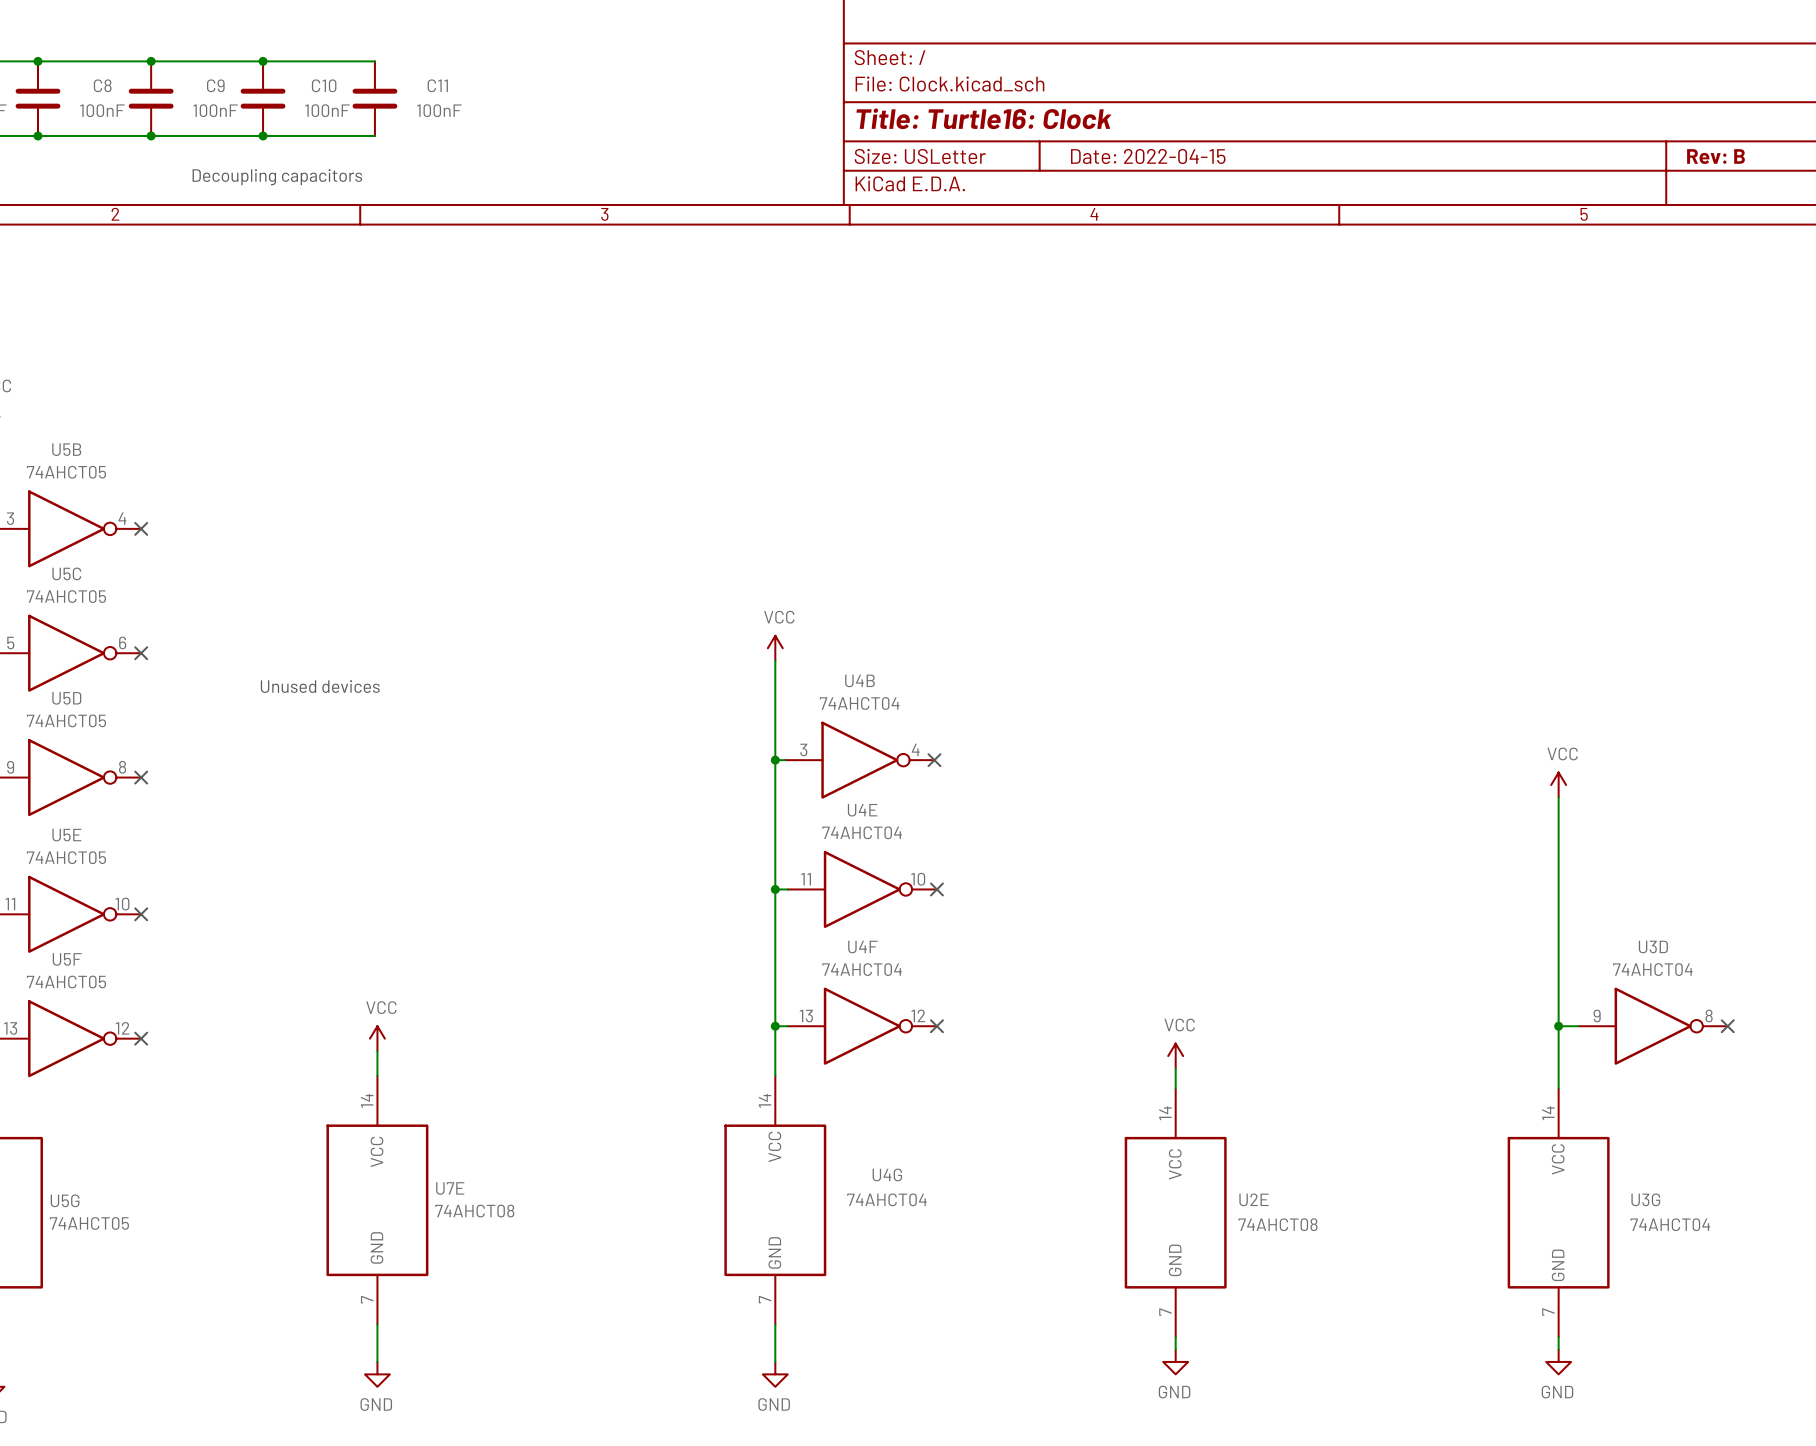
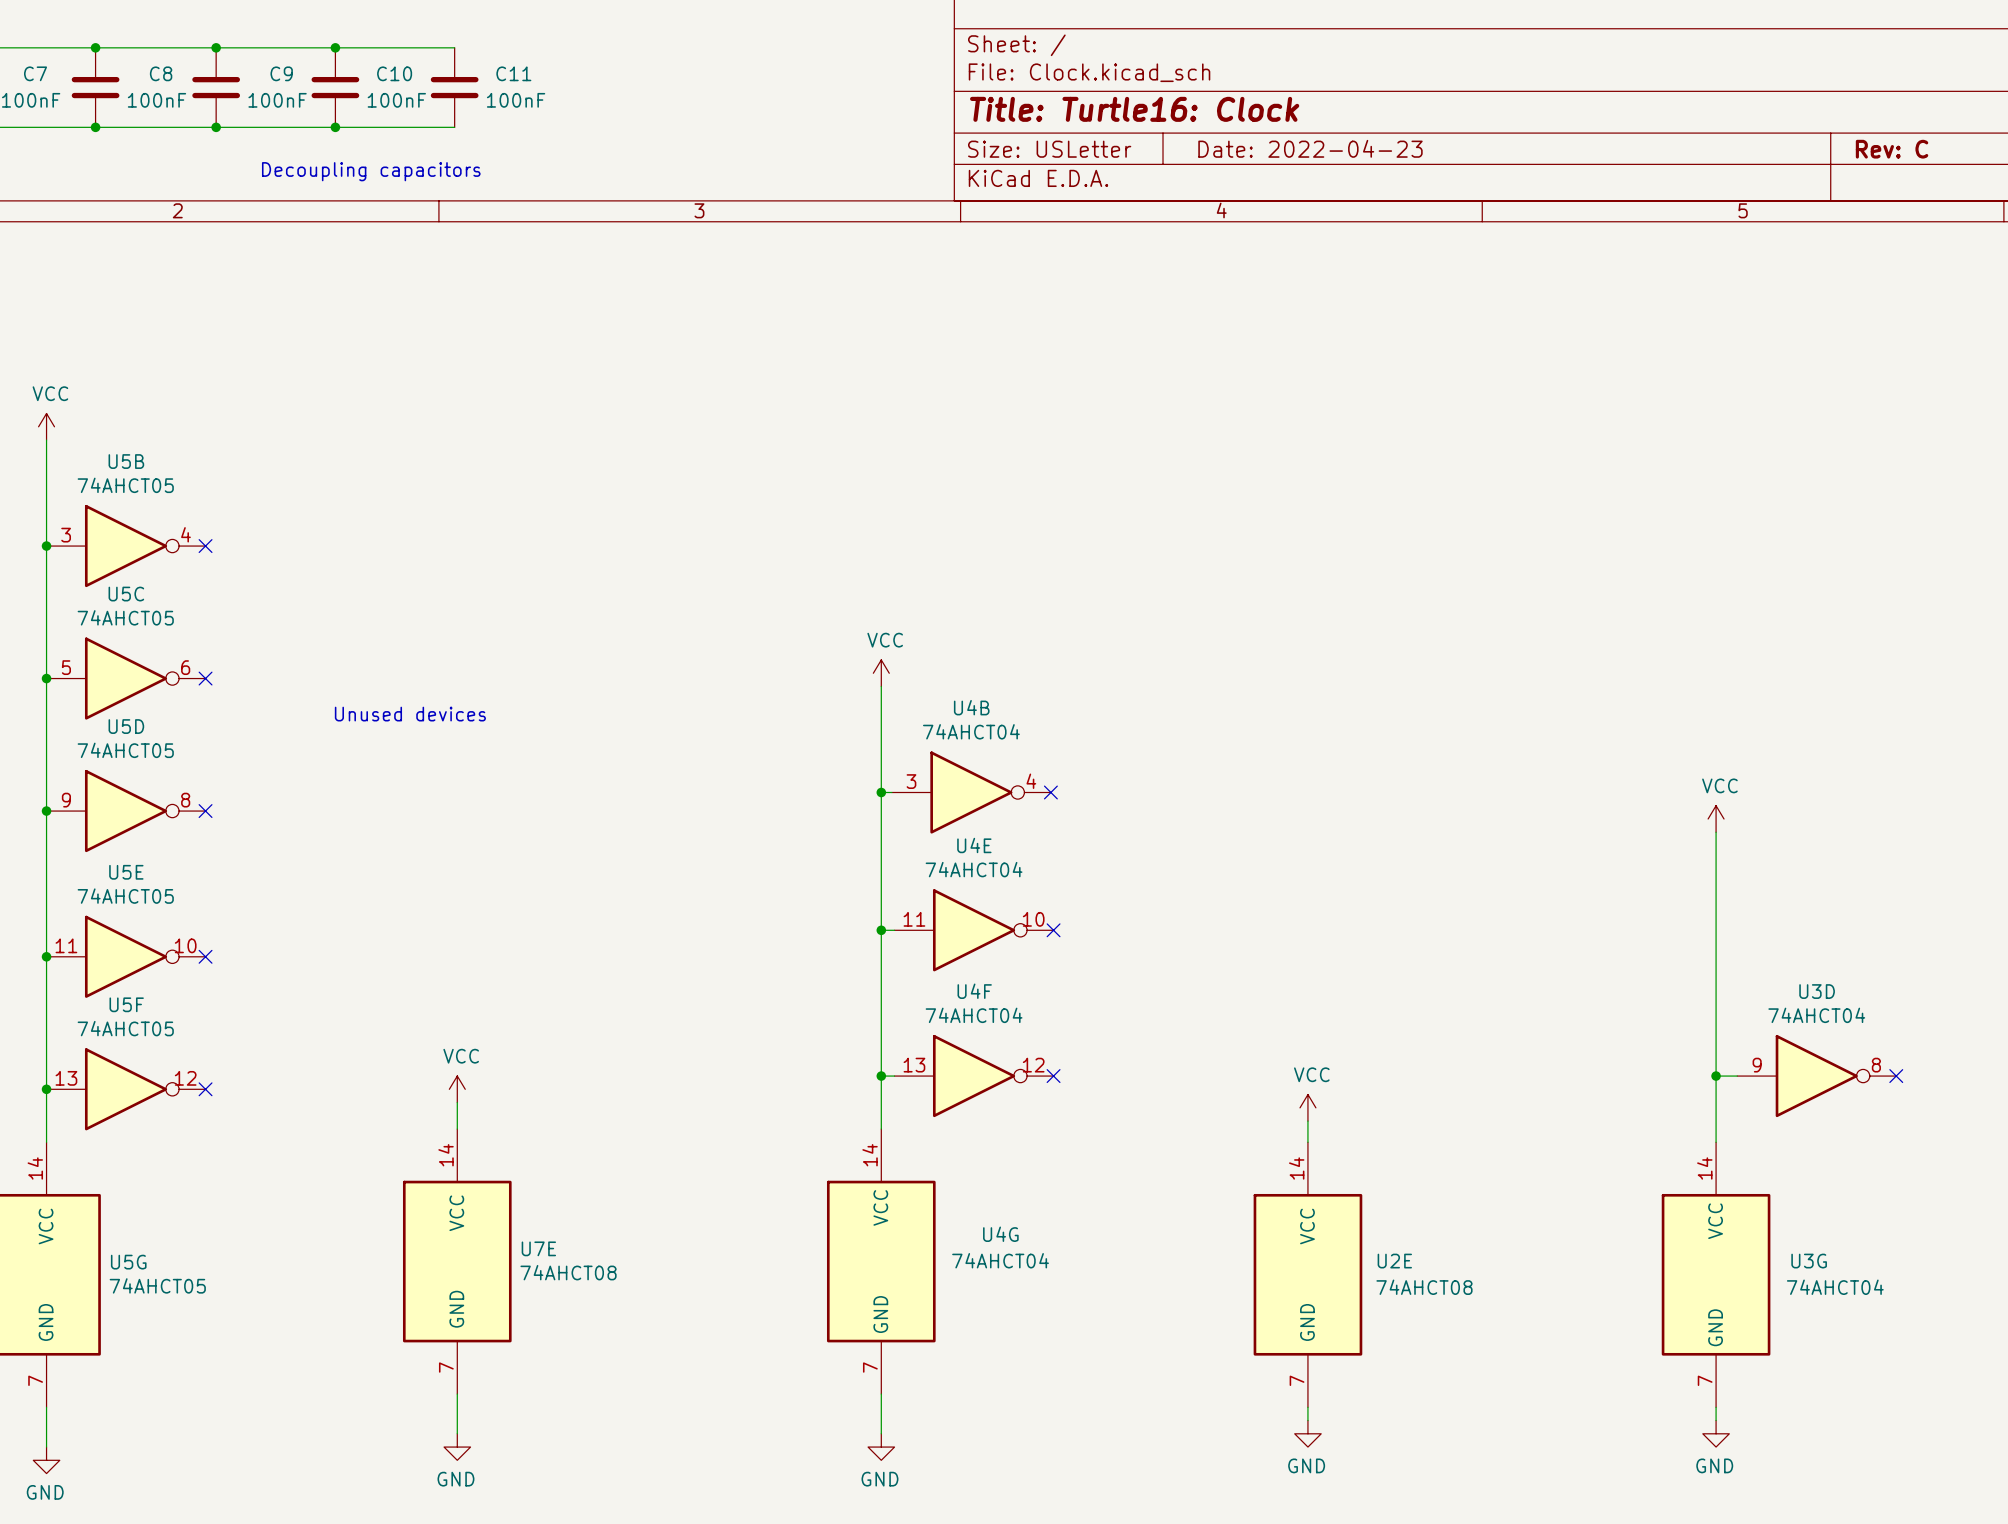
title block: Date: 2022-04-15 (1148, 156) -> Date: 2022-04-23 (1310, 148)
title block: Rev: B (1715, 156) -> Rev: C (1892, 149)

